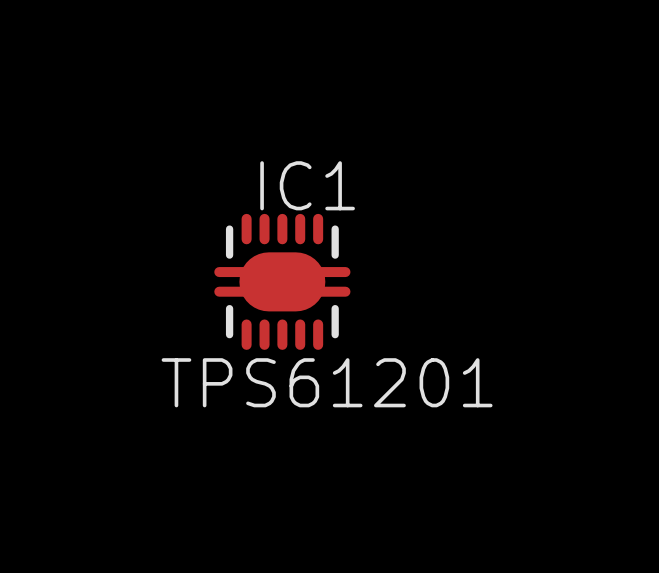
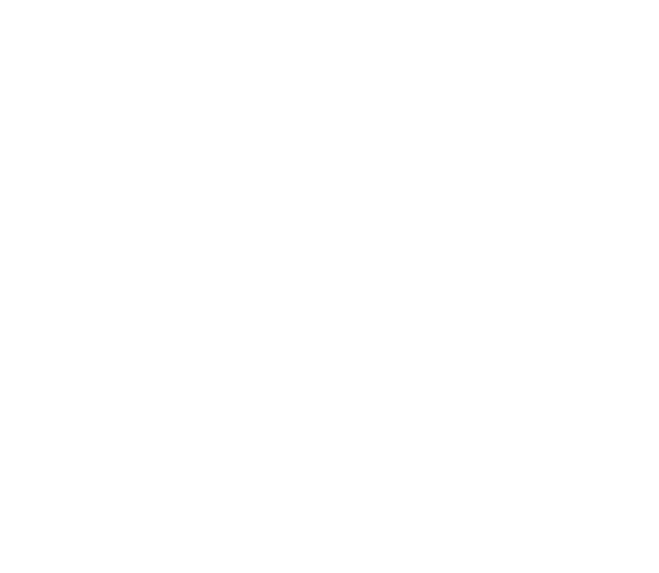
IC1: TPS61201 (282, 281) -> none

